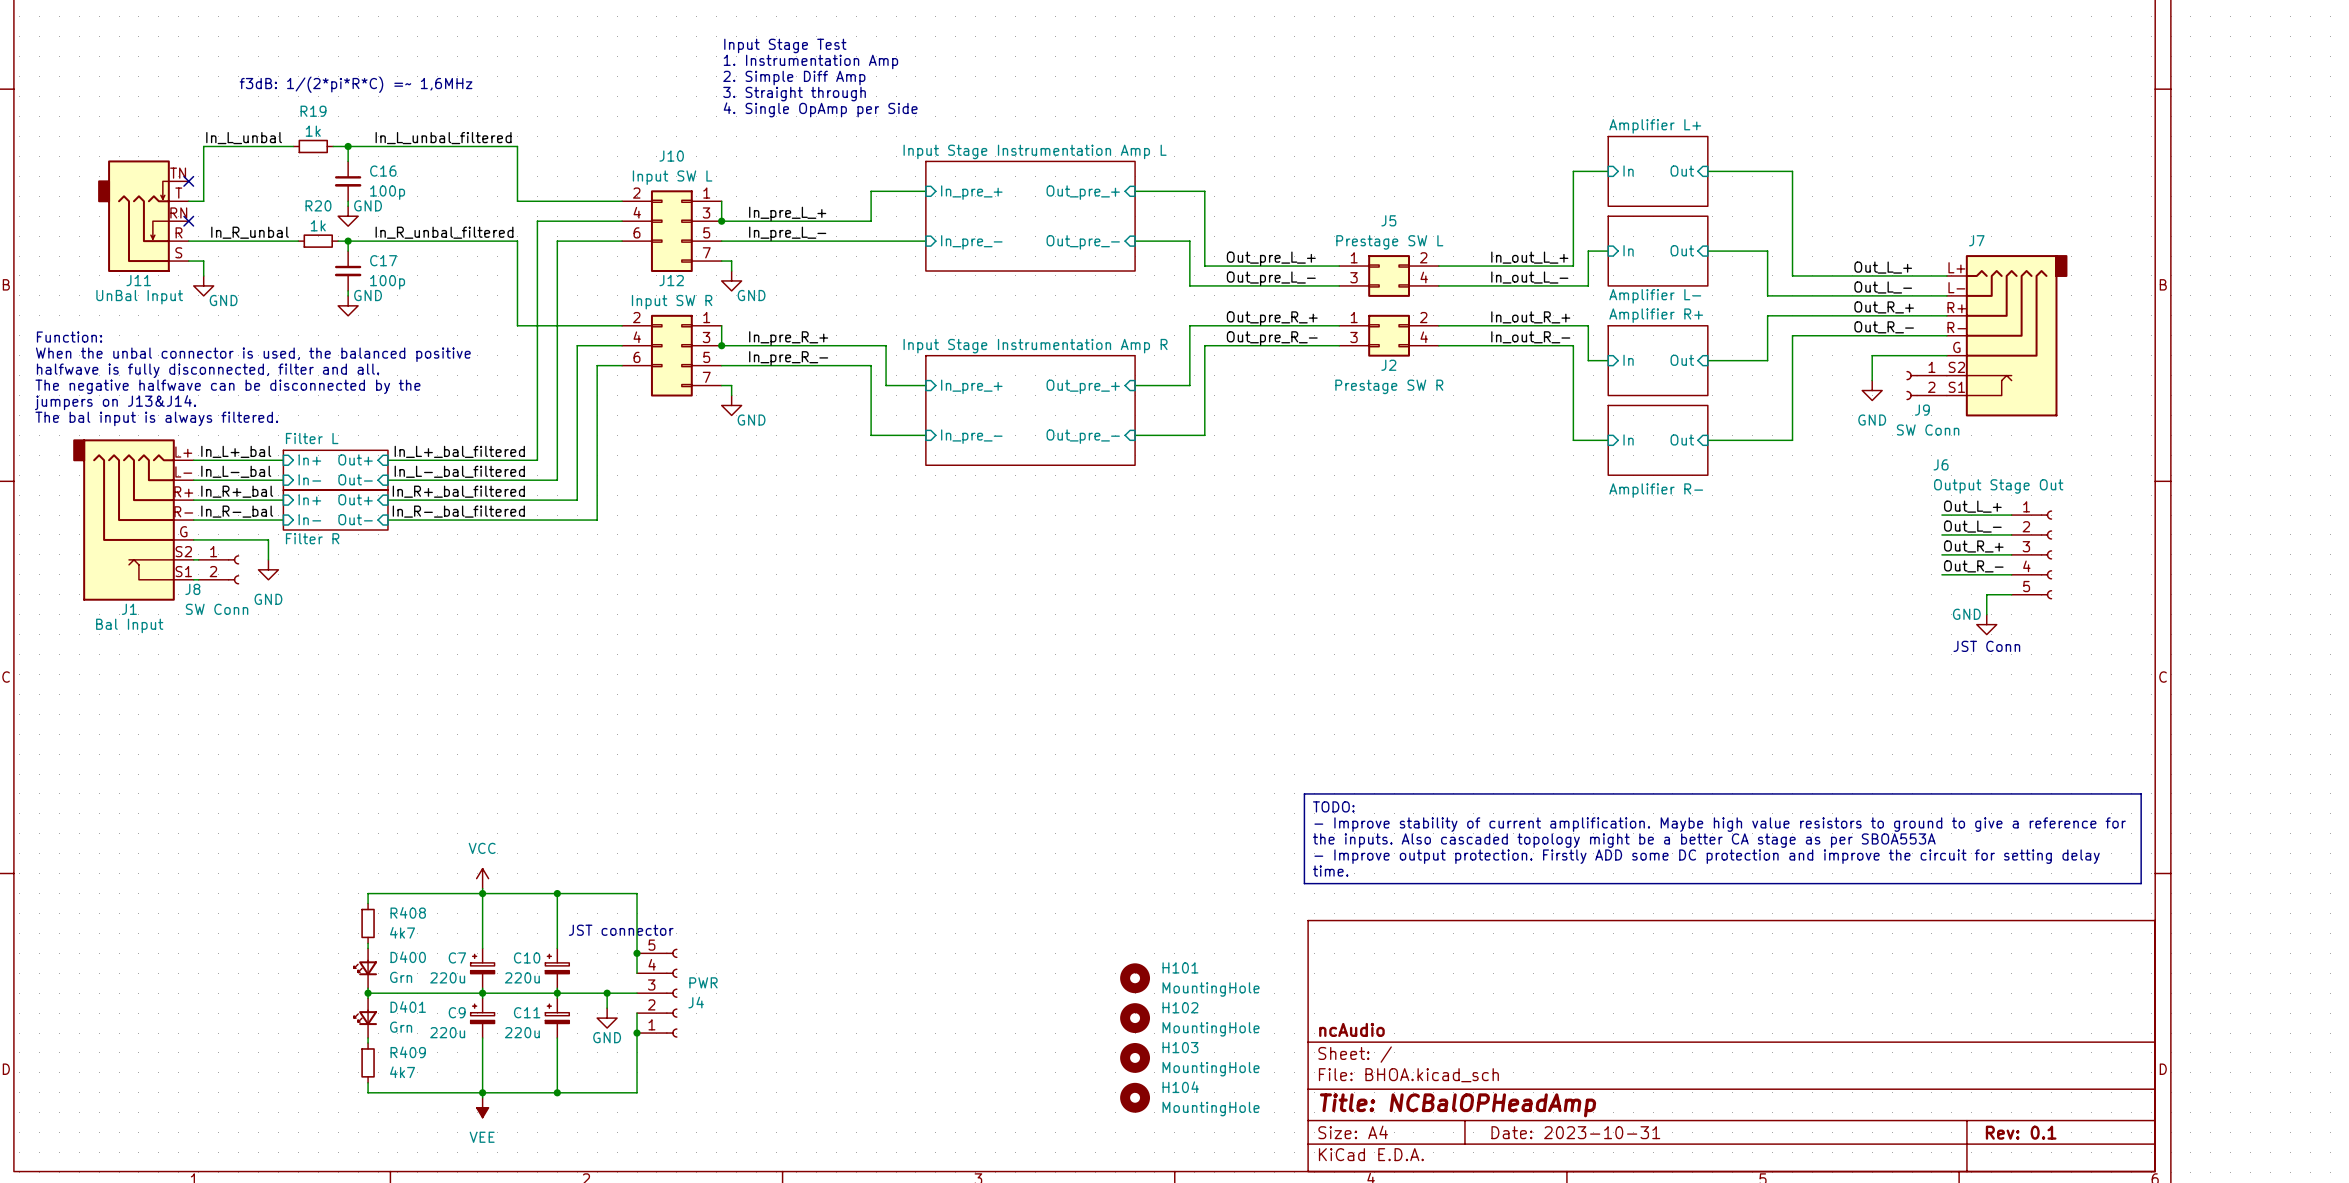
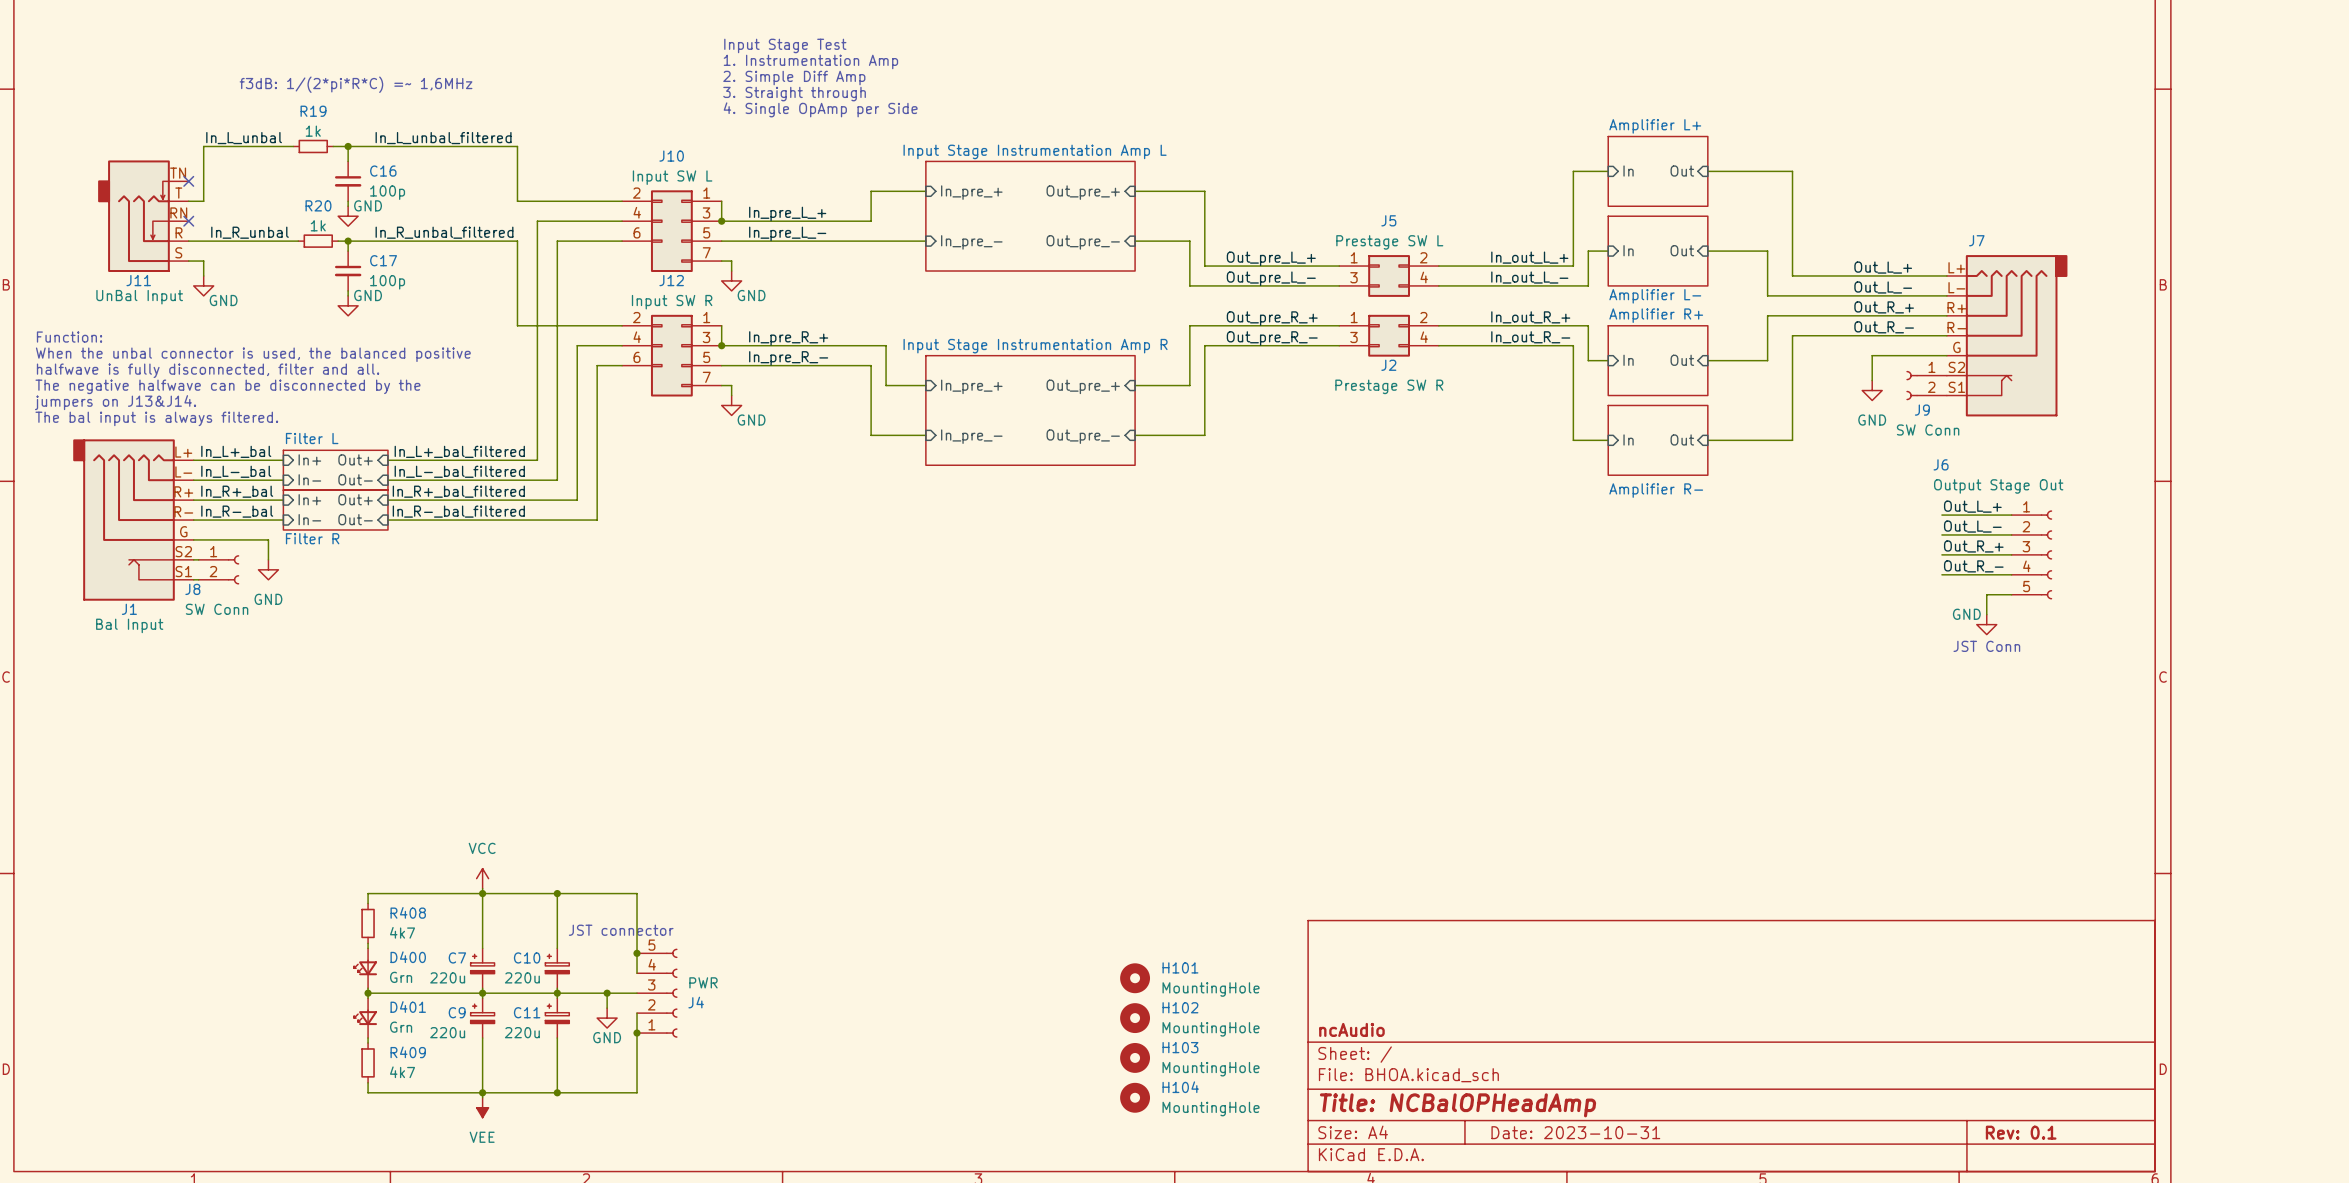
line: (1304, 793) (2141, 793) (2141, 883) (1304, 883) (1304, 793) -> none
text: TODO: (1333, 806) -> none
text: - Improve stability of current amplification. Maybe high value resistors to ground to give a reference for (1720, 824) -> none
text: the inputs. Also cascaded topology might be a better CA stage as per SBOA553A (1624, 840) -> none
text: - Improve output protection. Firstly ADD some DC protection and improve the circuit for setting delay (1707, 856) -> none
text: time. (1330, 871) -> none

